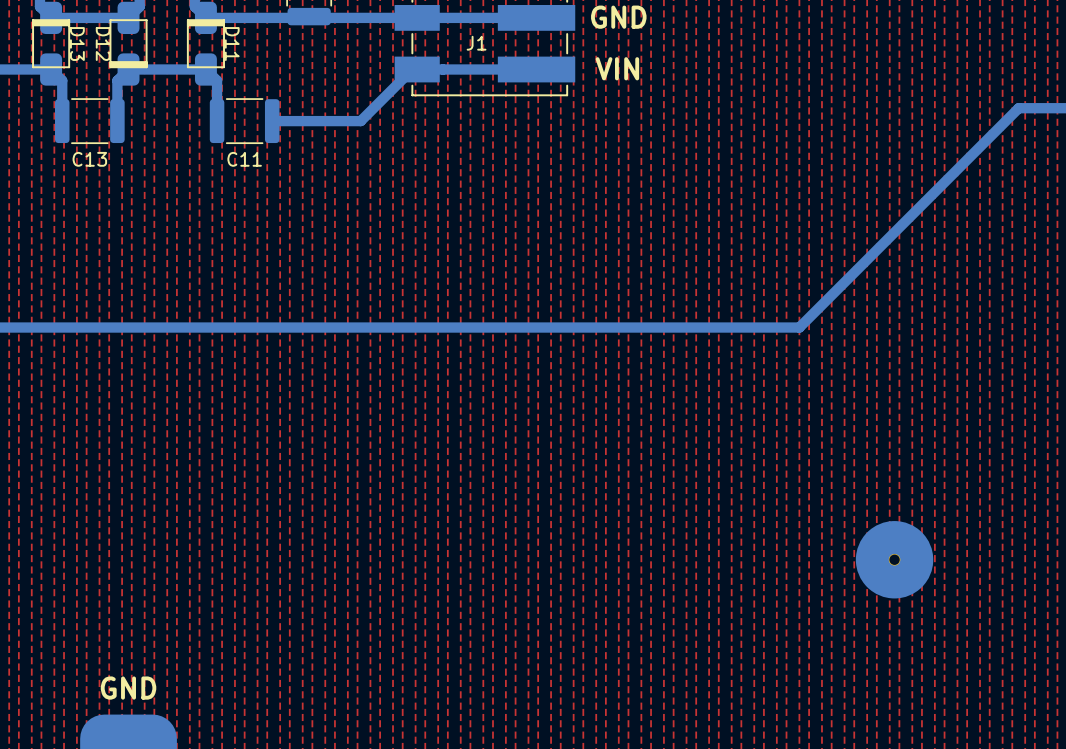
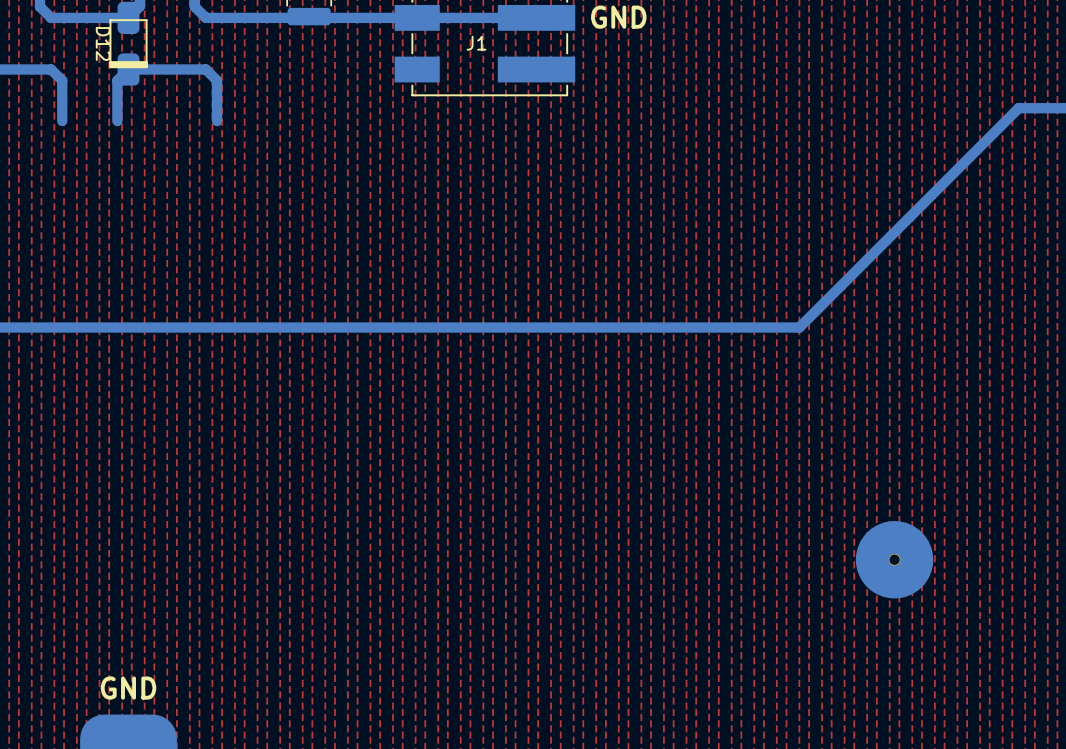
D13: (51, 43) -> none
D11: (205, 43) -> none
text: VIN (617, 68) -> none
bottom track: (562, 69) (412, 69) (360, 121) (272, 121) -> none
C13: (89, 121) -> none
C11: (244, 121) -> none

